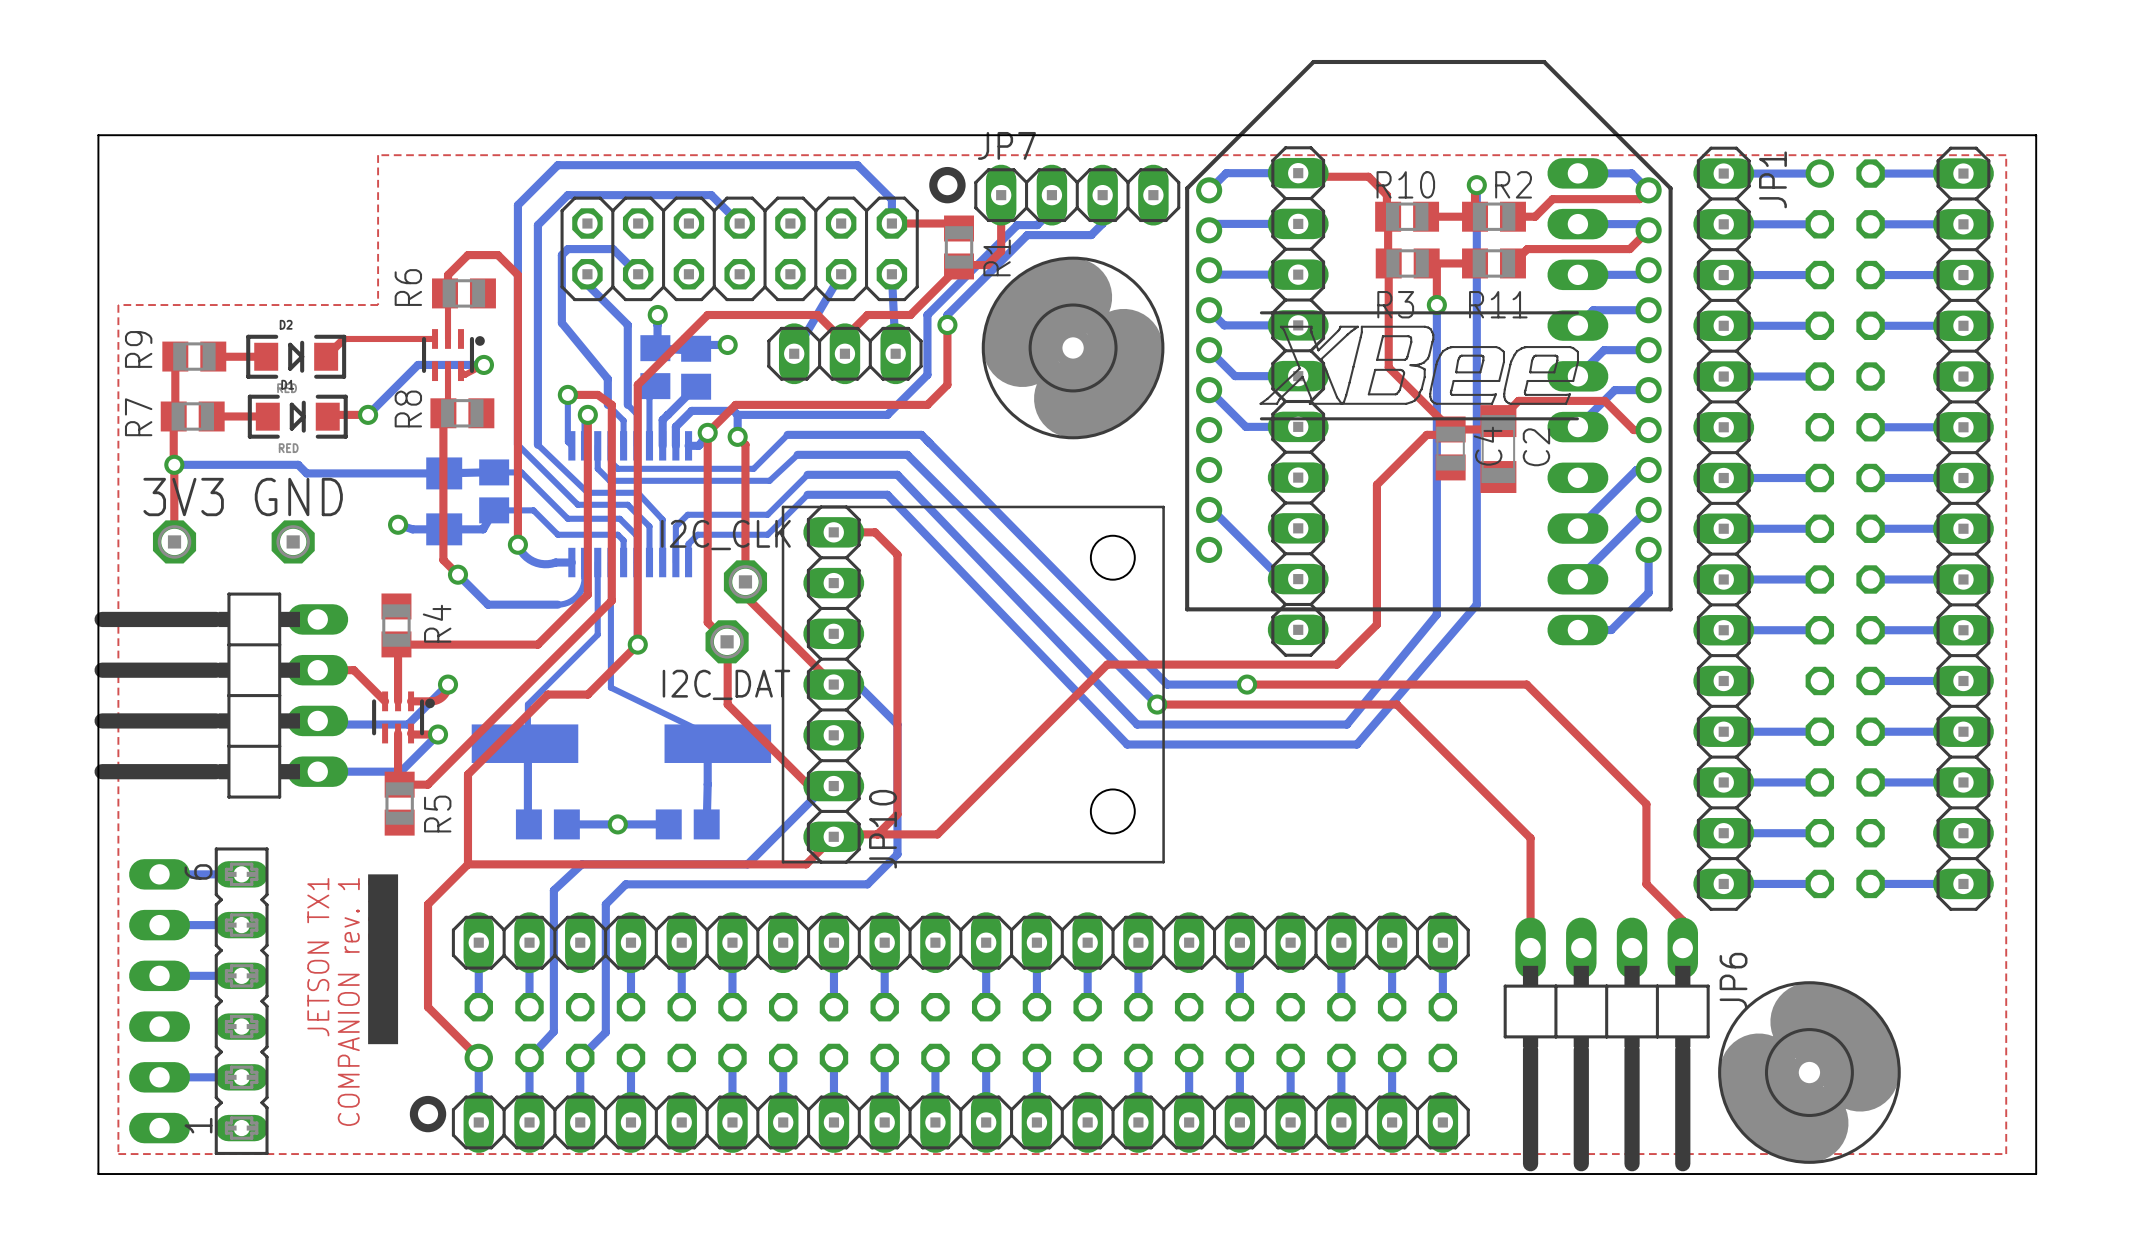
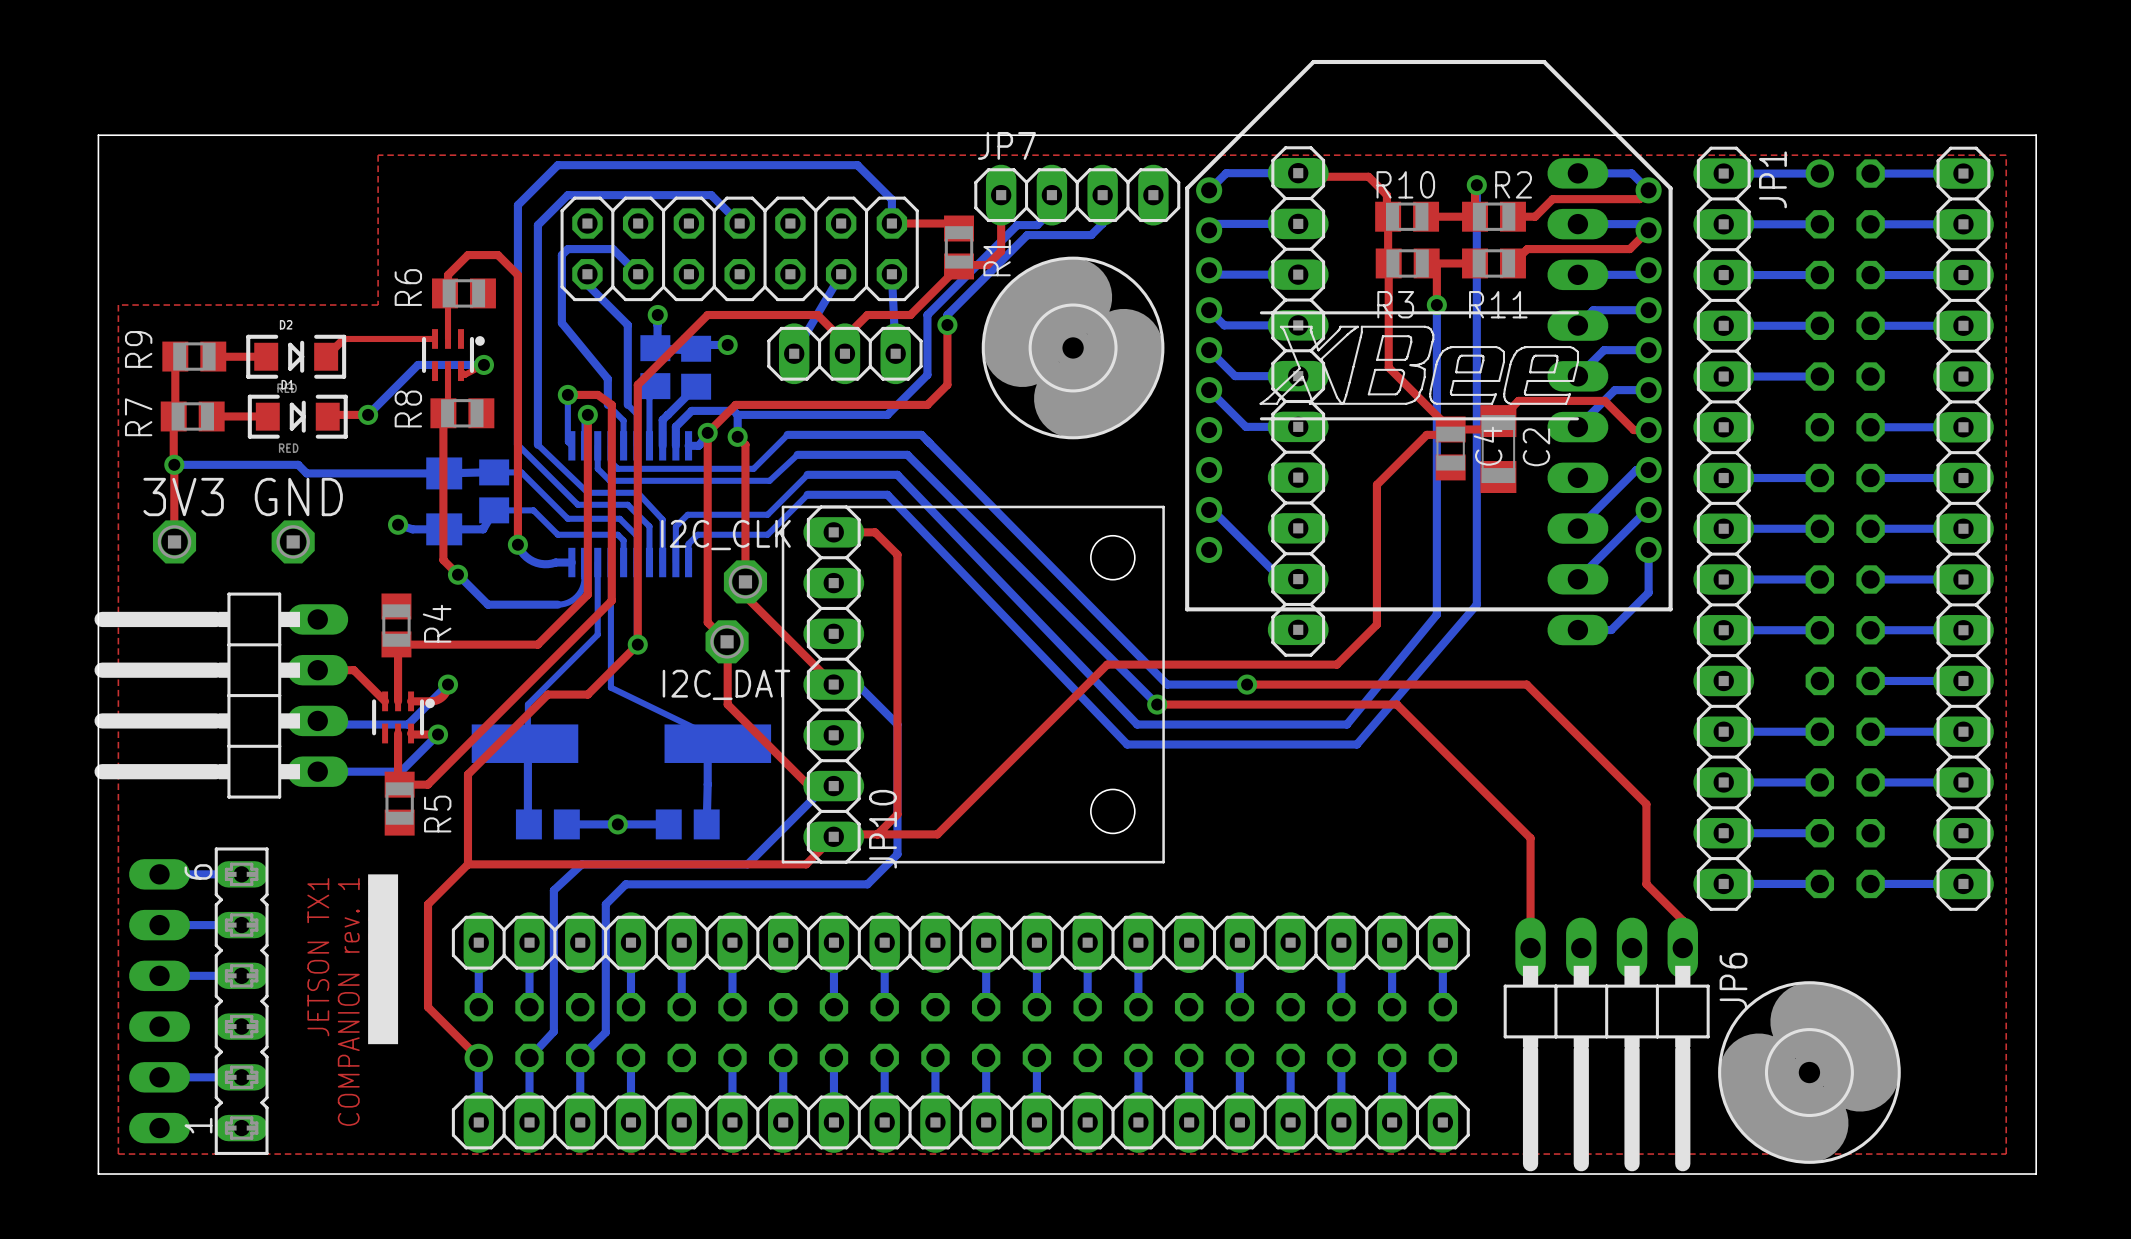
drawing: [929, 166, 966, 204] -> none
drawing: [409, 1095, 447, 1133] -> none

